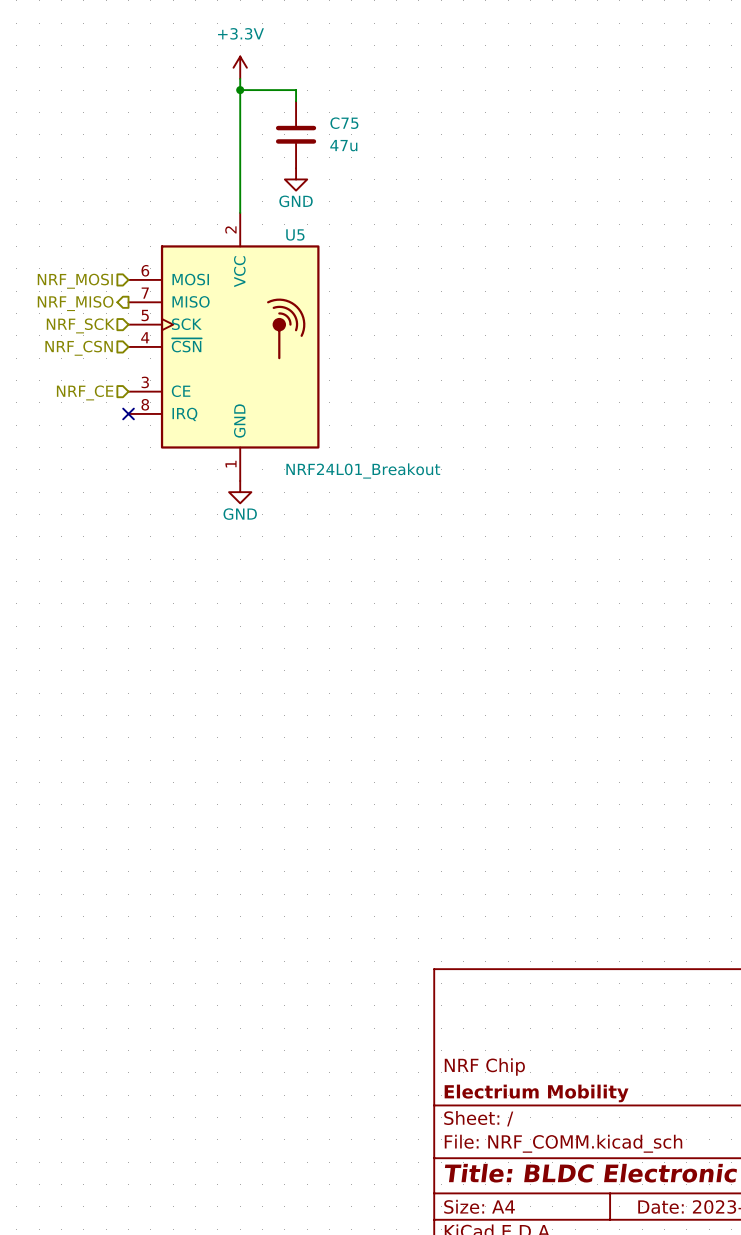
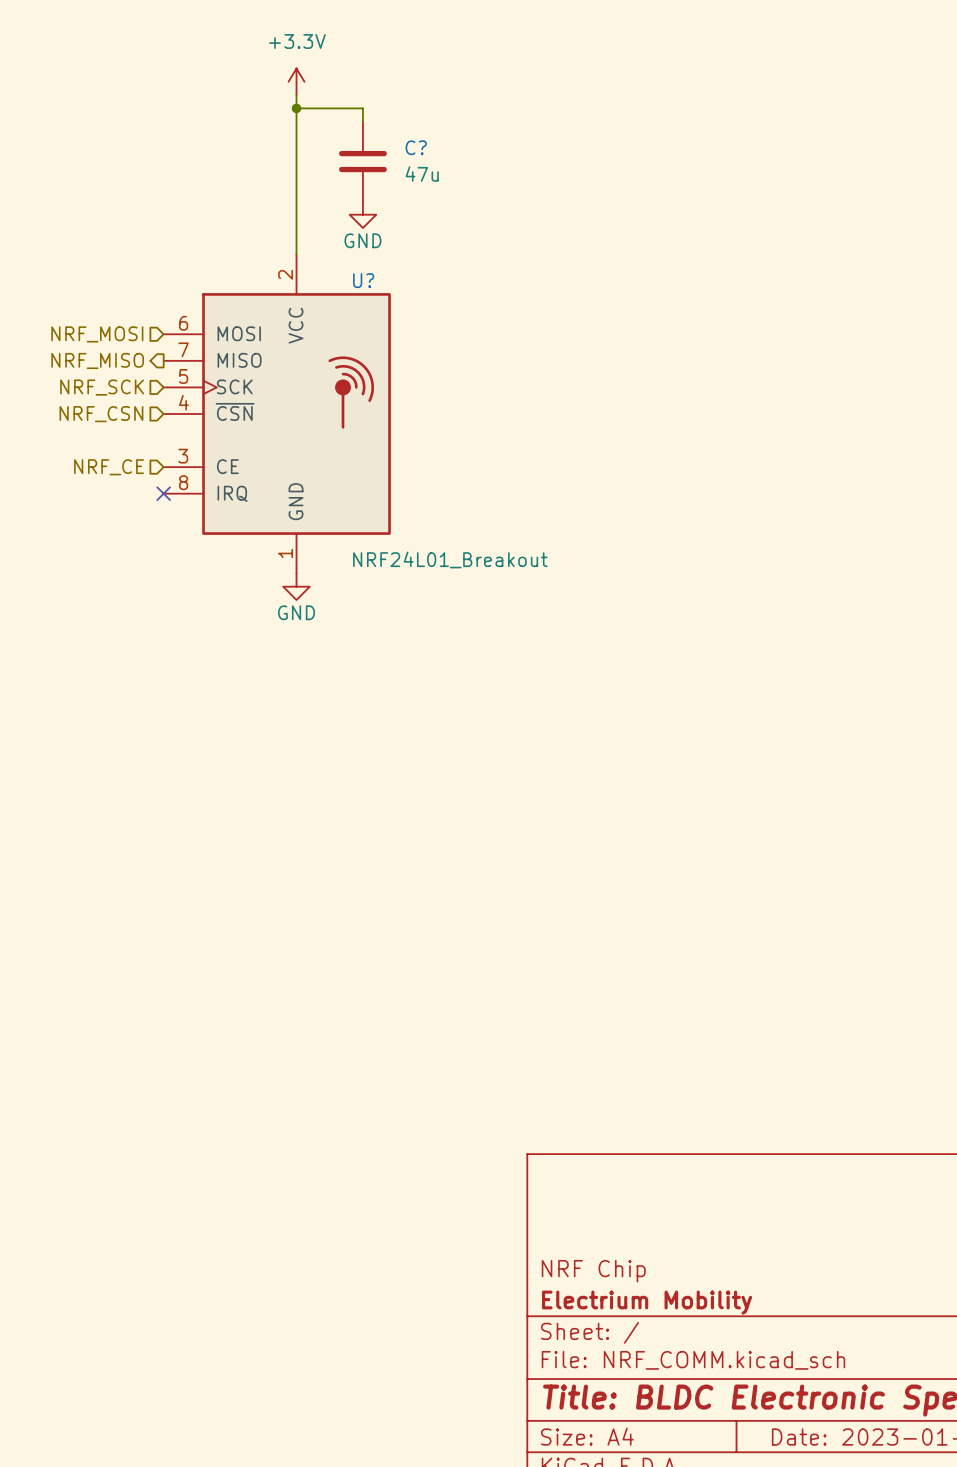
C75 name: C75 (344, 123) -> C? (416, 147)
U5 name: U5 (295, 234) -> U? (363, 280)

